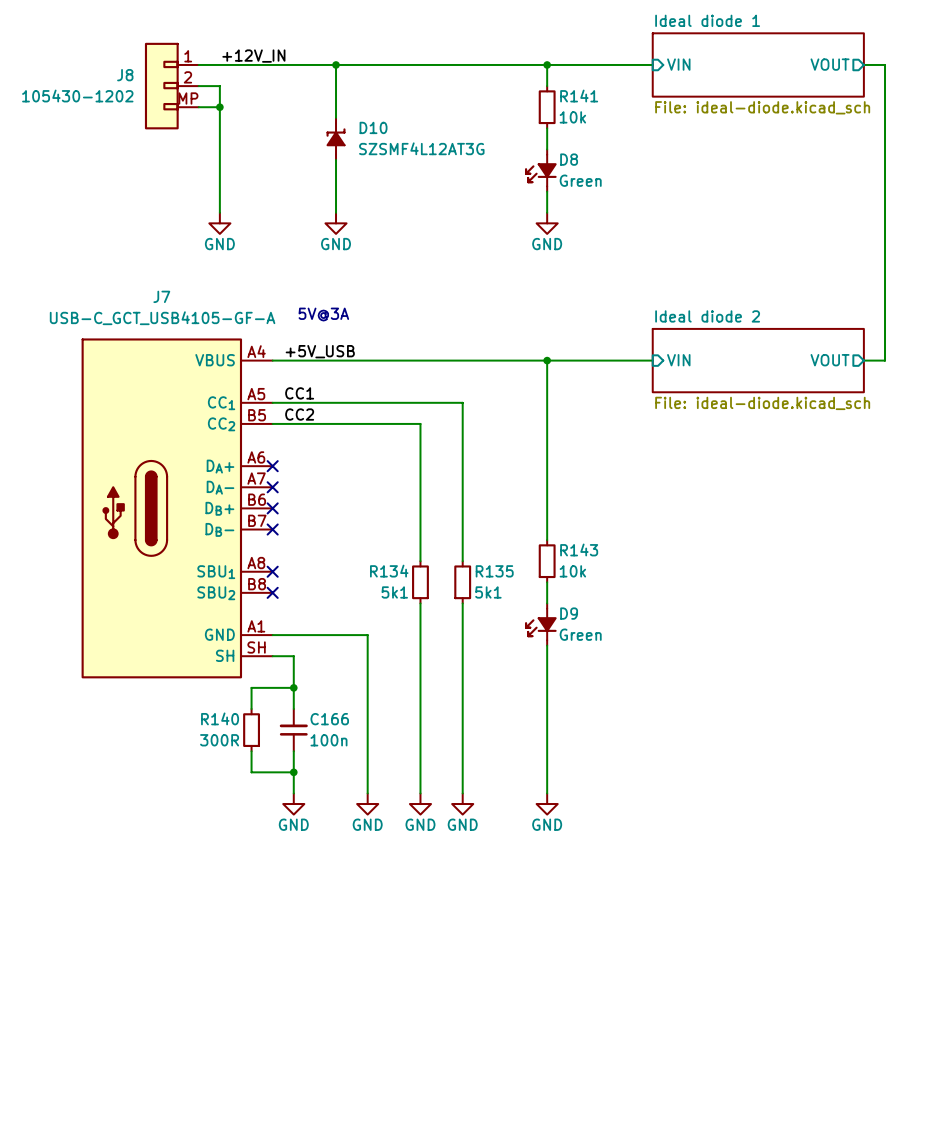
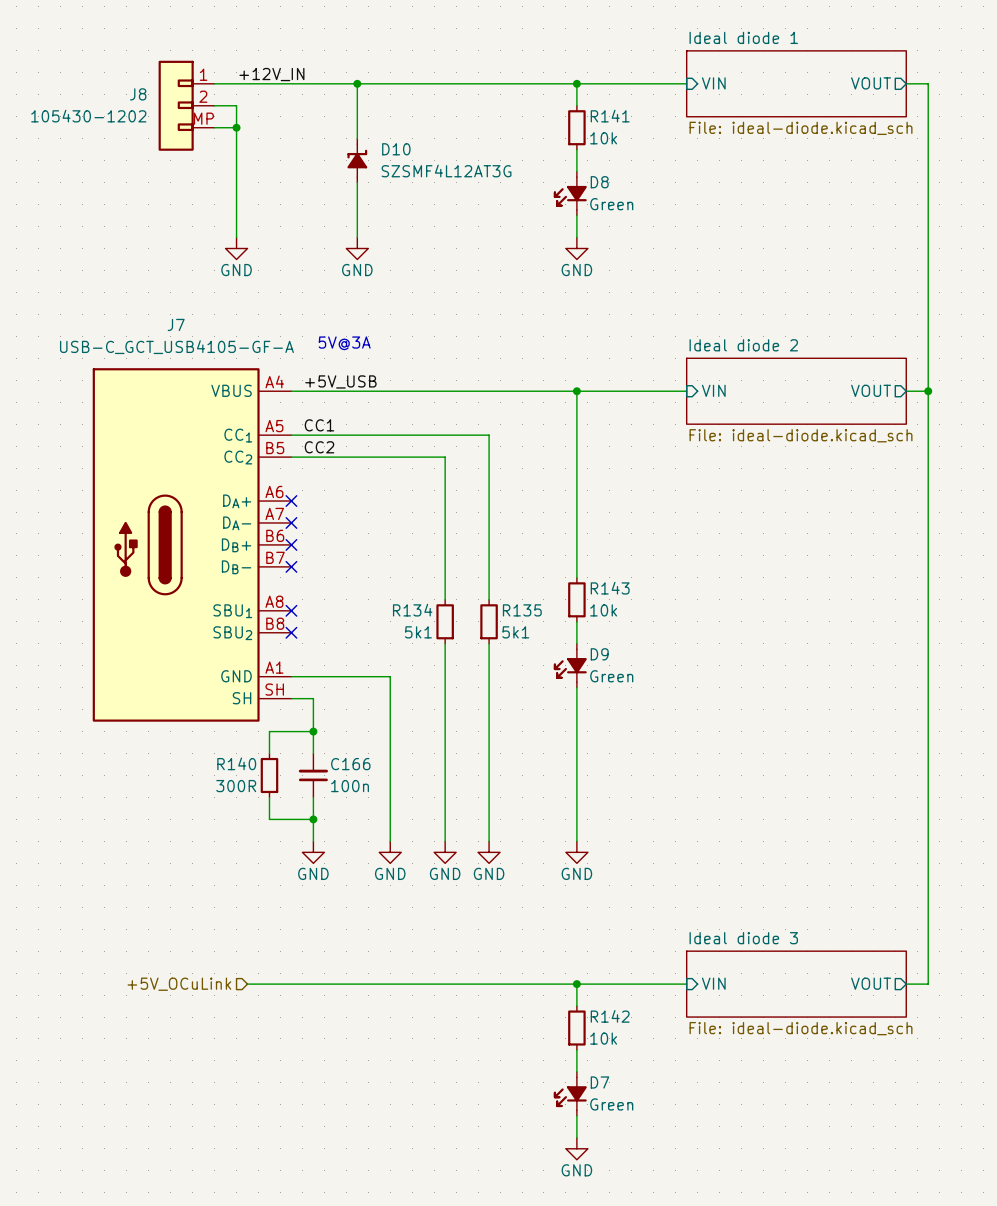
wire: none -> (928, 391) (928, 984) (906, 984)
junction: none -> (928, 391)
hierarchical label: none -> +5V_OCuLink (179, 984)
wire: none -> (247, 984) (686, 984)
wire: none -> (576, 984) (576, 1006)
junction: none -> (576, 984)
sheet pin: none -> VIN (713, 983)
sheet Ideal diode 3: none -> File: ideal-diode.kicad_sch (796, 984)
sheet pin: none -> VOUT (871, 983)
R142: none -> (576, 1028)
wire: none -> (576, 1049) (576, 1071)
D7: none -> (570, 1093)
wire: none -> (576, 1115) (576, 1137)
power symbol: none -> GND (576, 1148)

